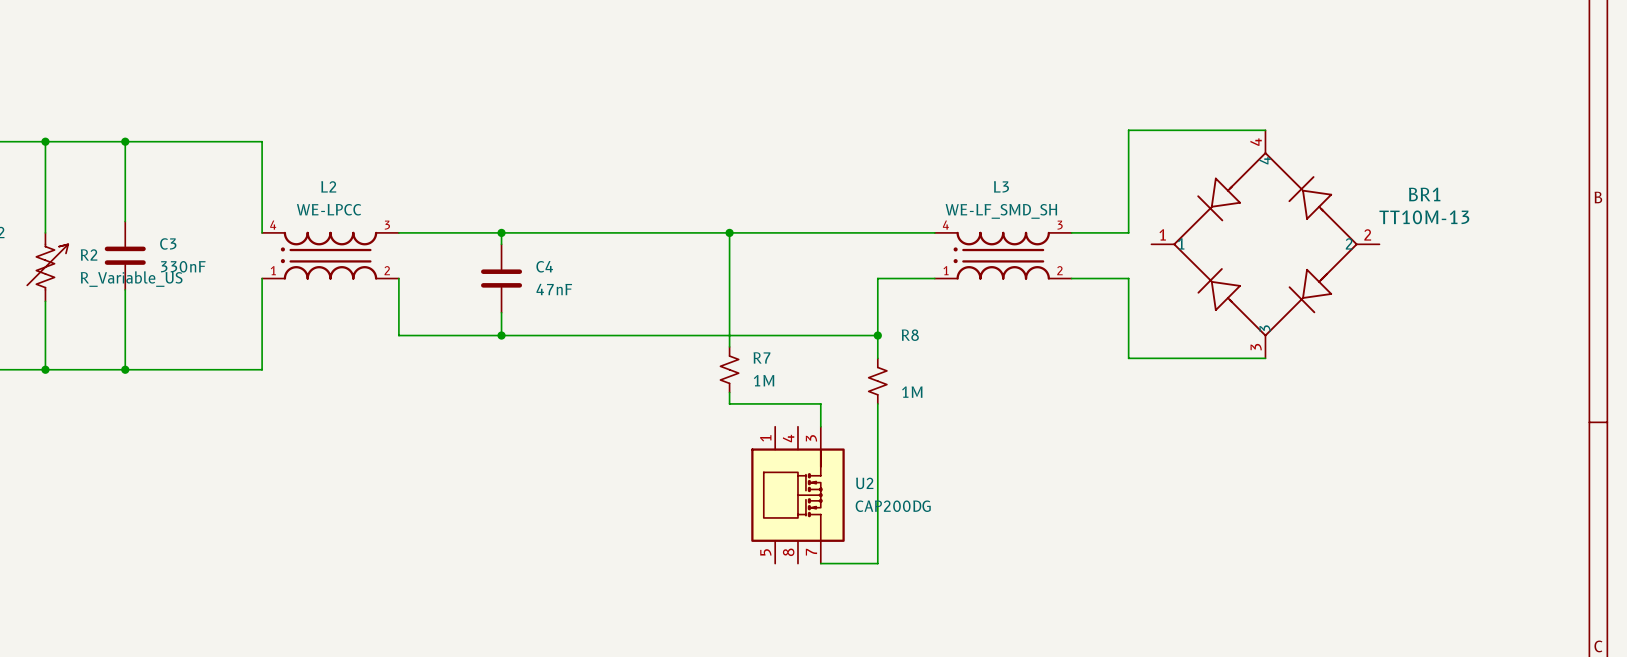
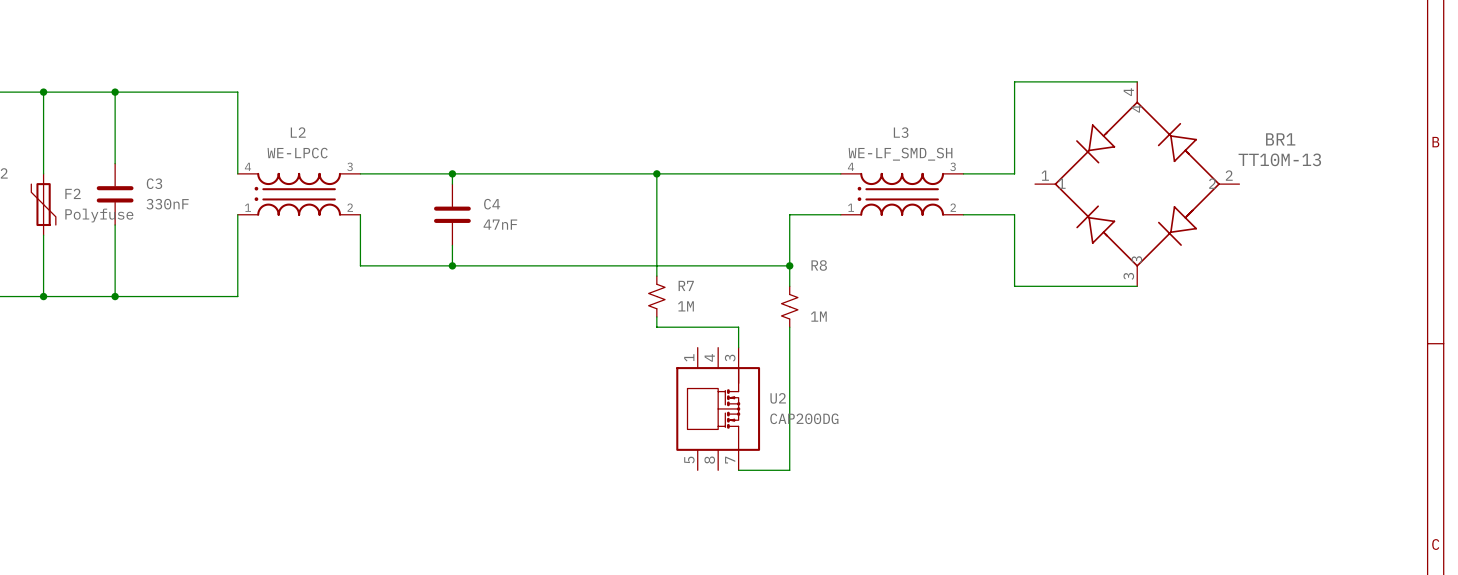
F2: none -> Polyfuse (43, 204)
R2: R_Variable_US (47, 267) -> none

